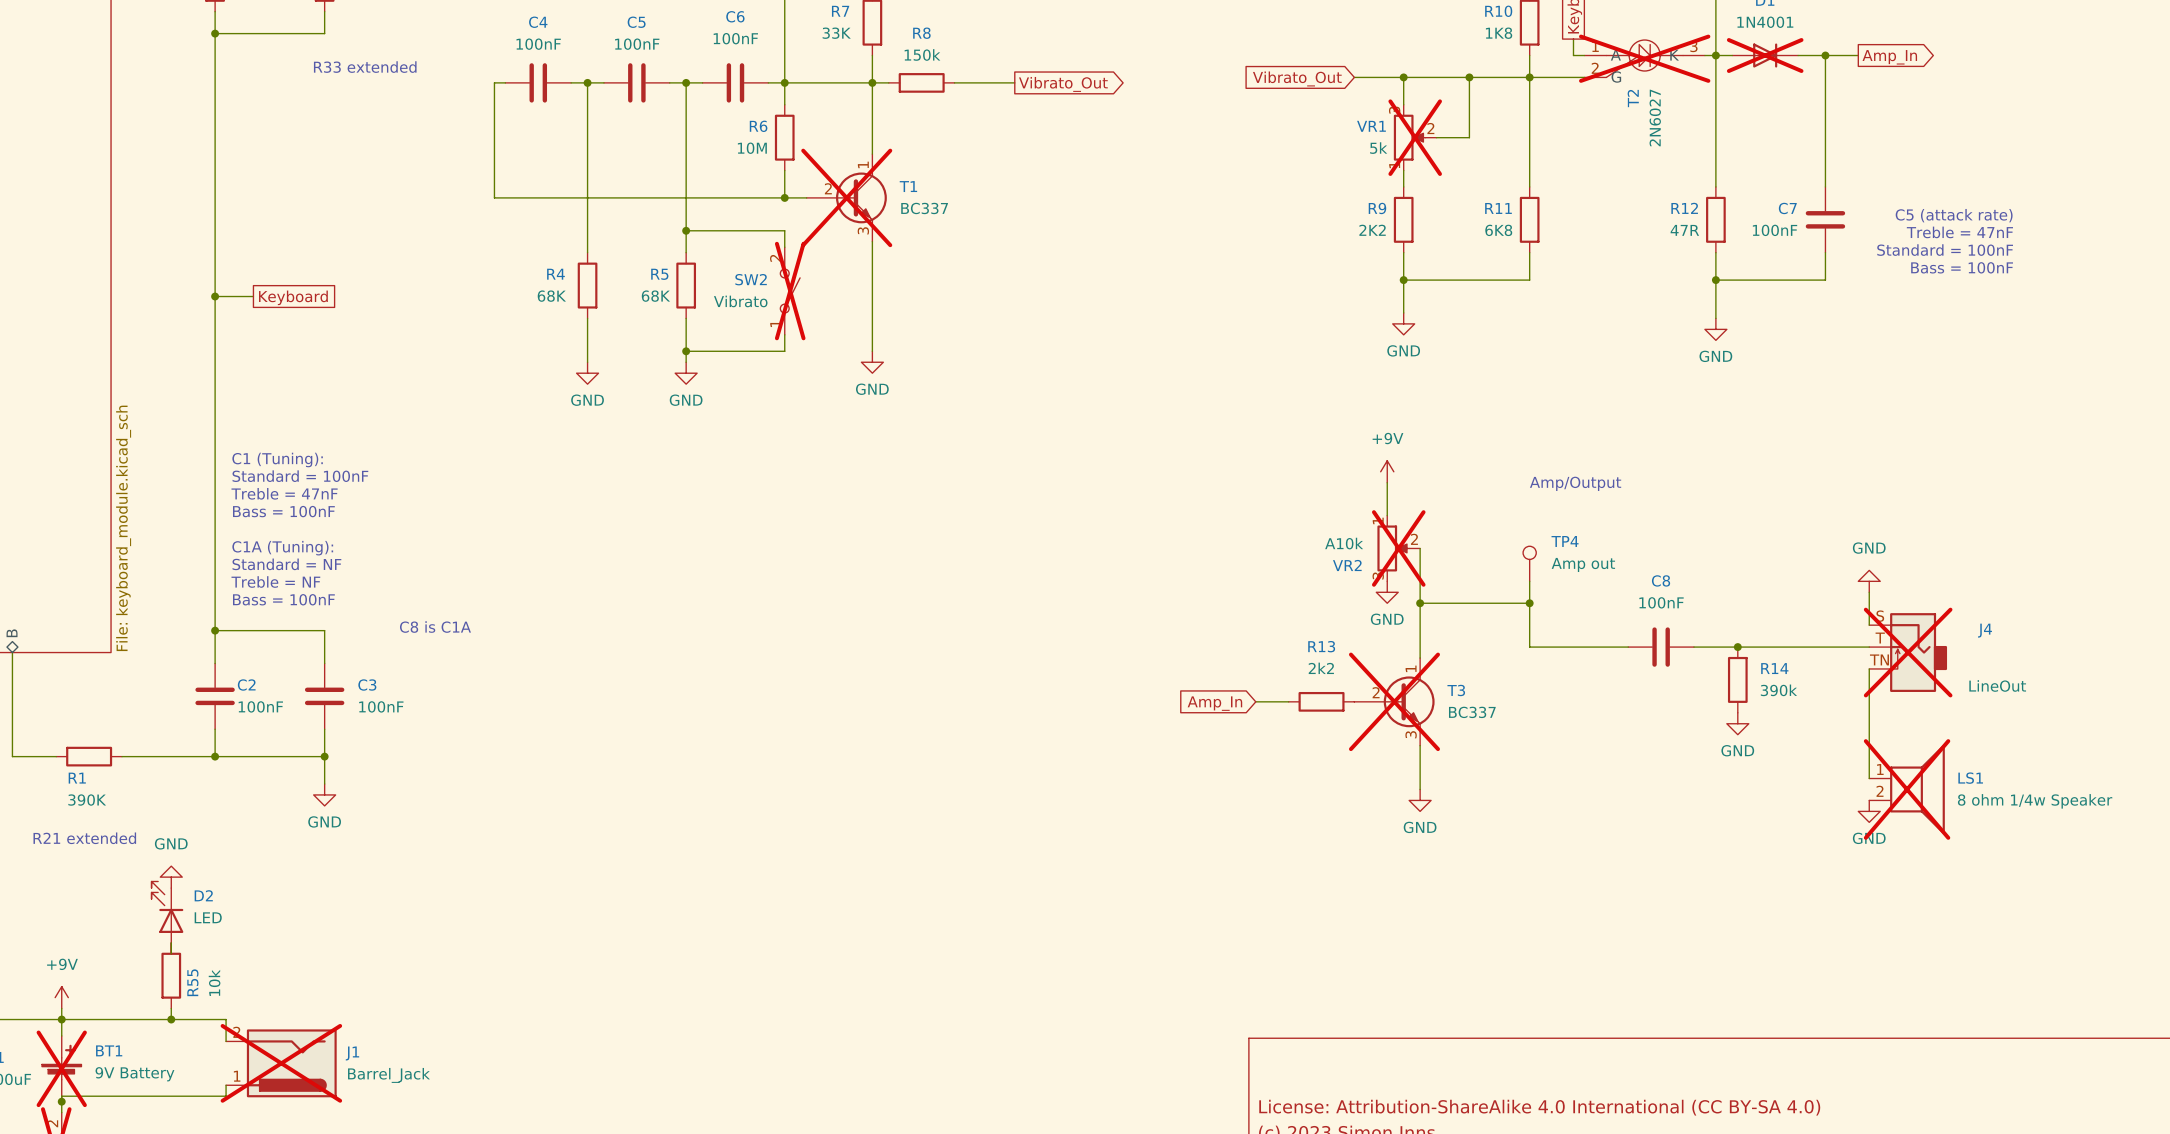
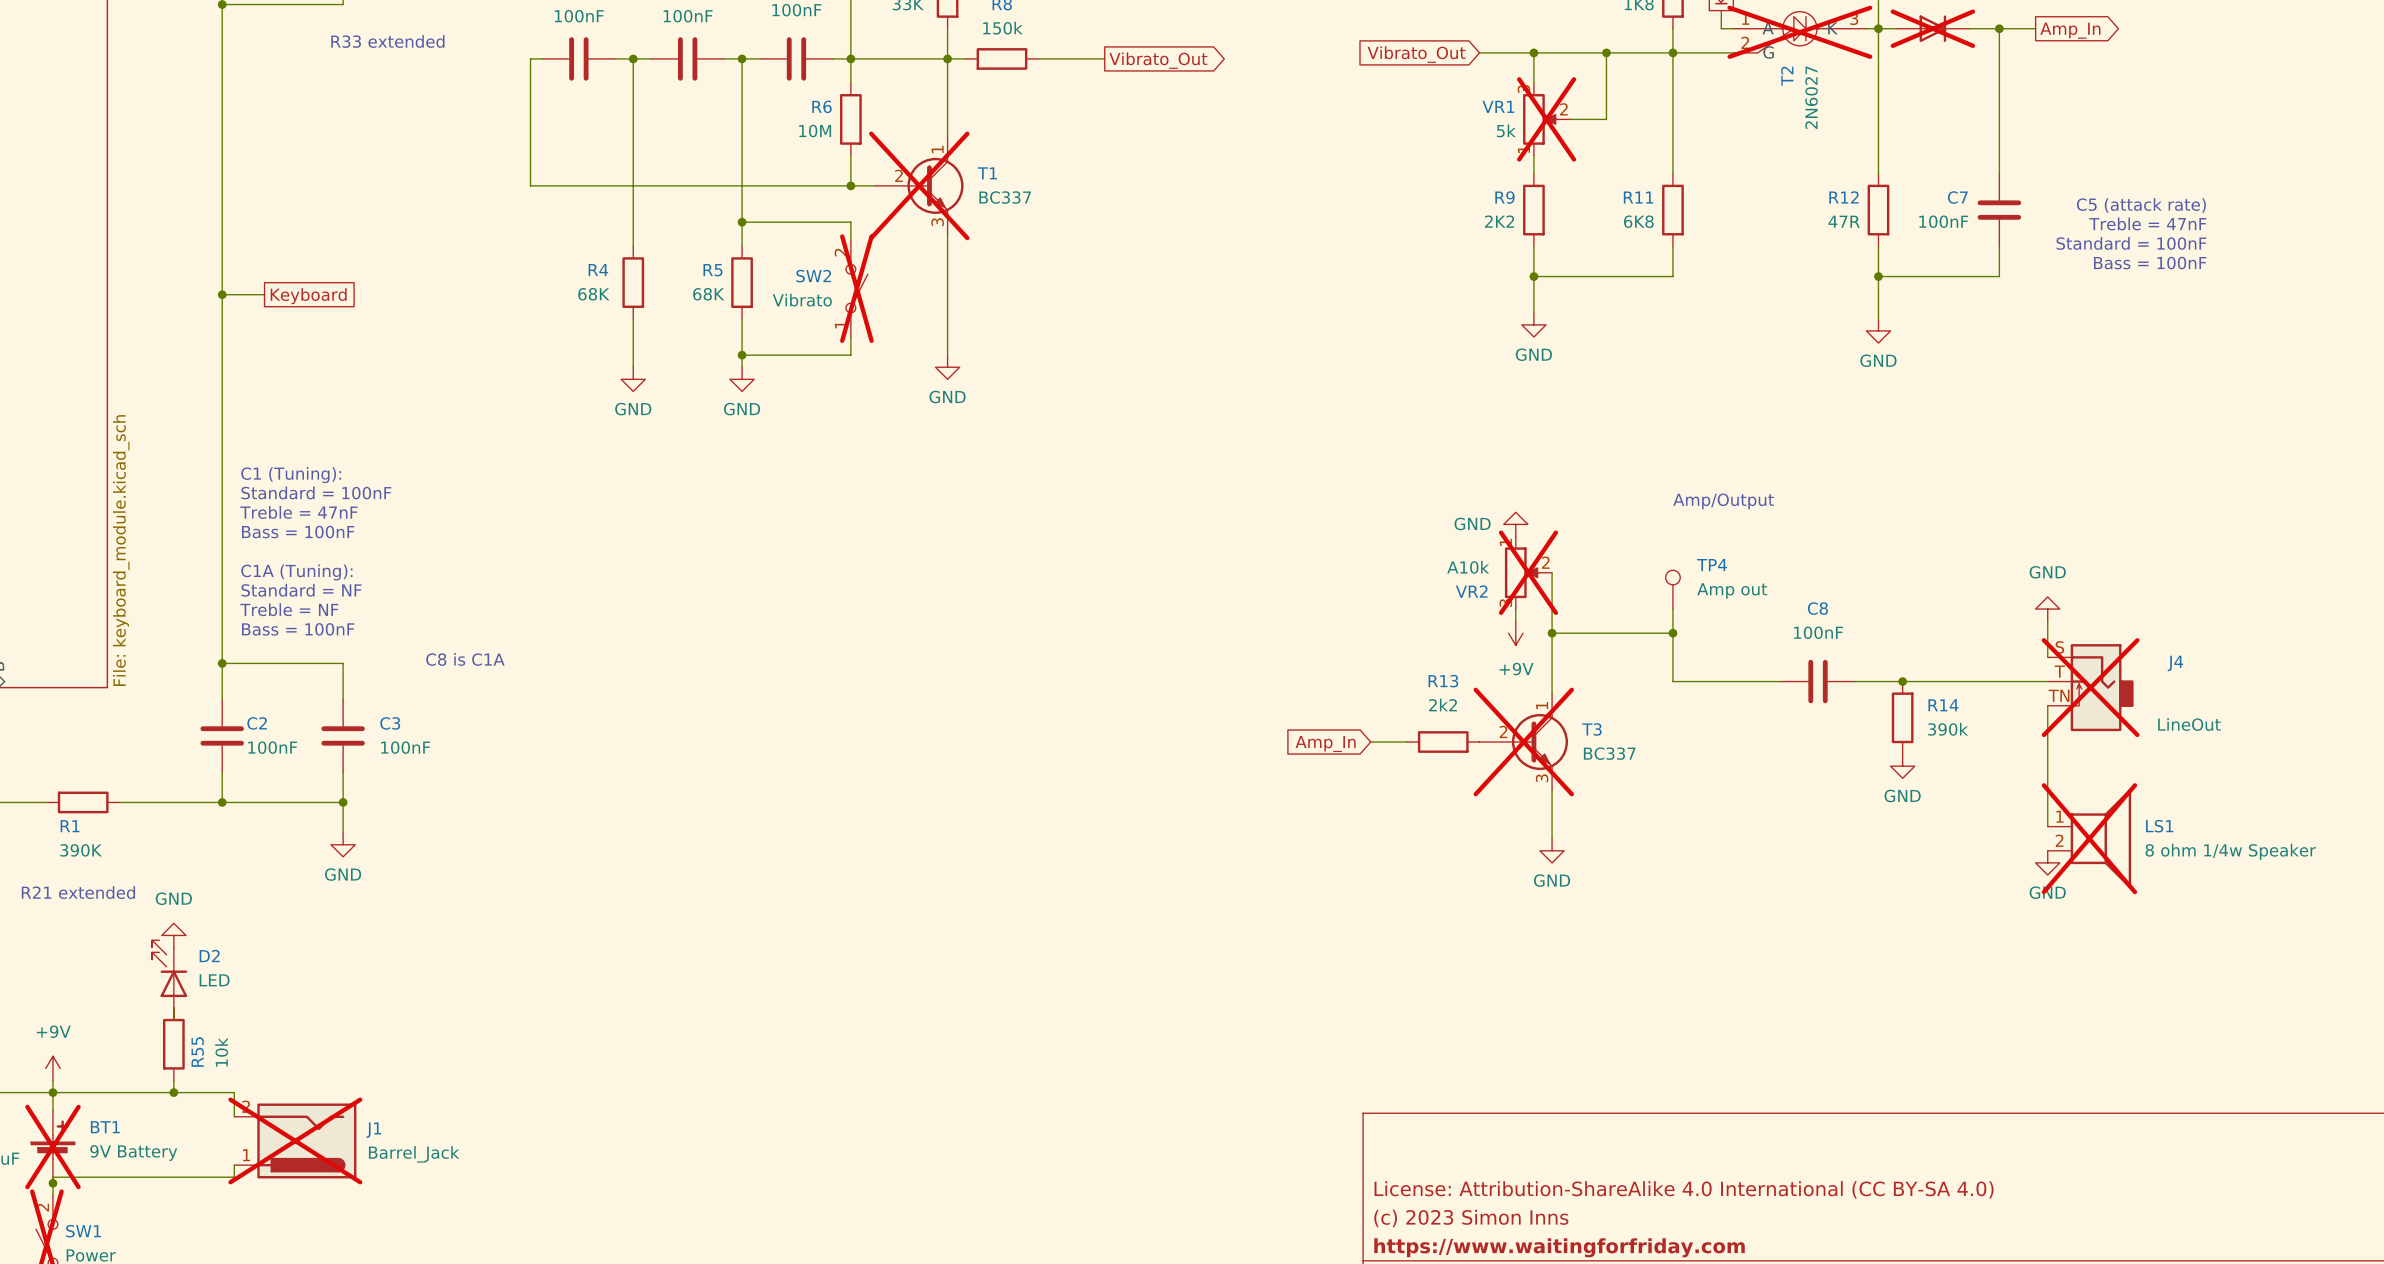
power symbol rotation: 0° (1387, 471) -> 180° (1515, 633)
power symbol position: +9V (1387, 471) -> +9V (1515, 633)
wire: (1387, 482) (1387, 515) -> none
power symbol rotation: 0° (1387, 592) -> 180° (1515, 524)
power symbol position: GND (1387, 592) -> GND (1515, 524)
power symbol text position: GND (1387, 619) -> GND (1472, 523)

